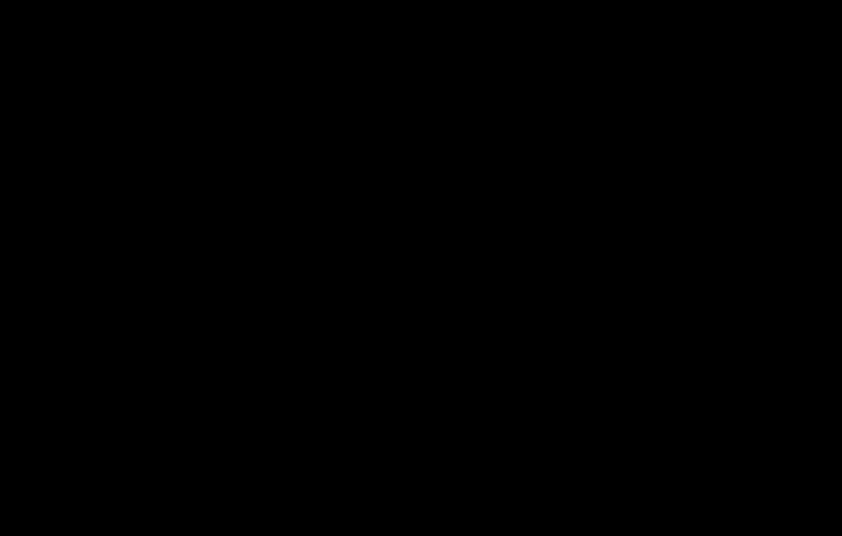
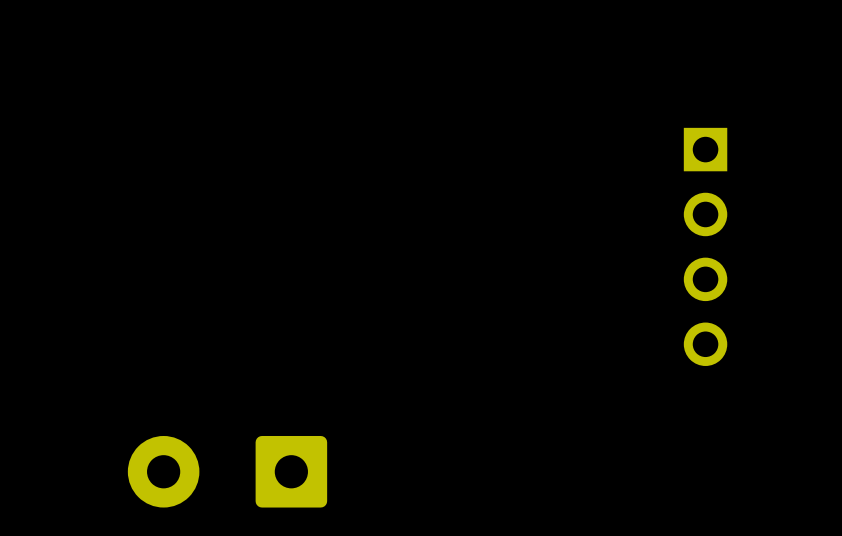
part: none -> (705, 246)
part: none -> (227, 471)

